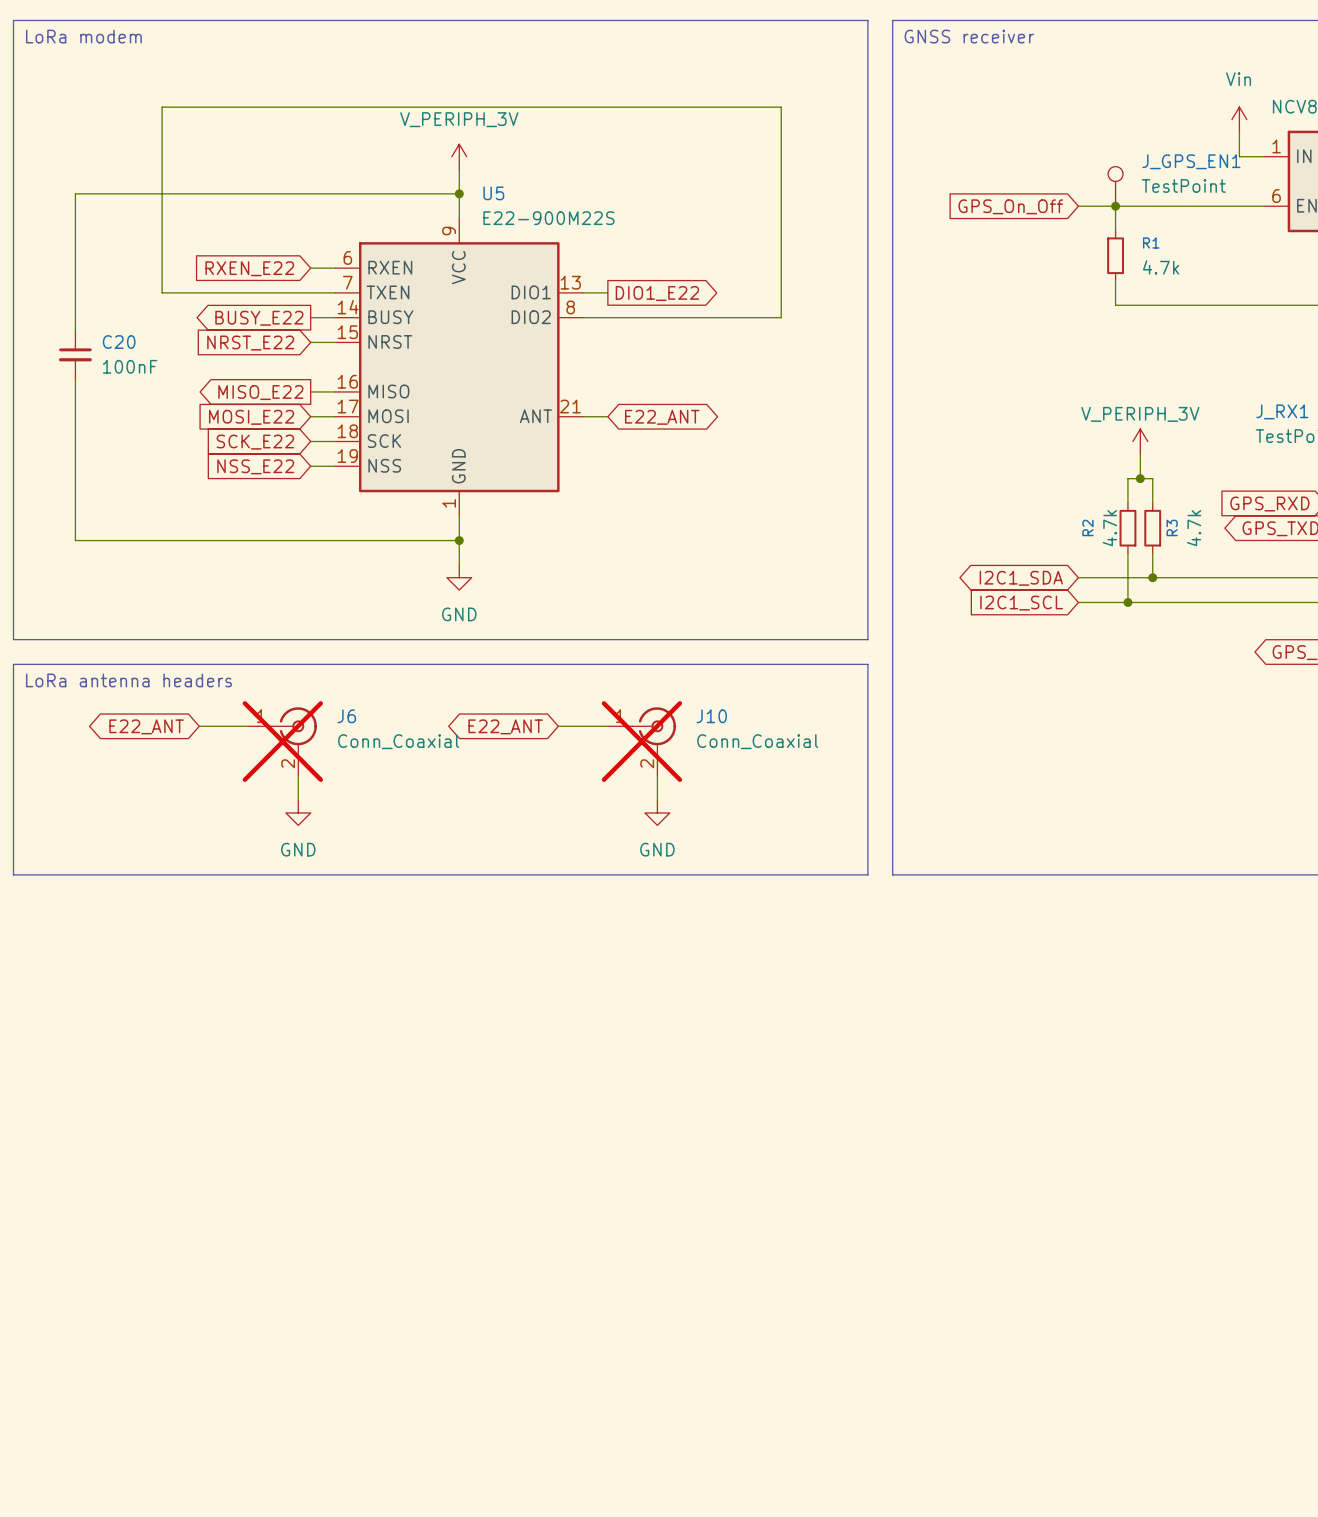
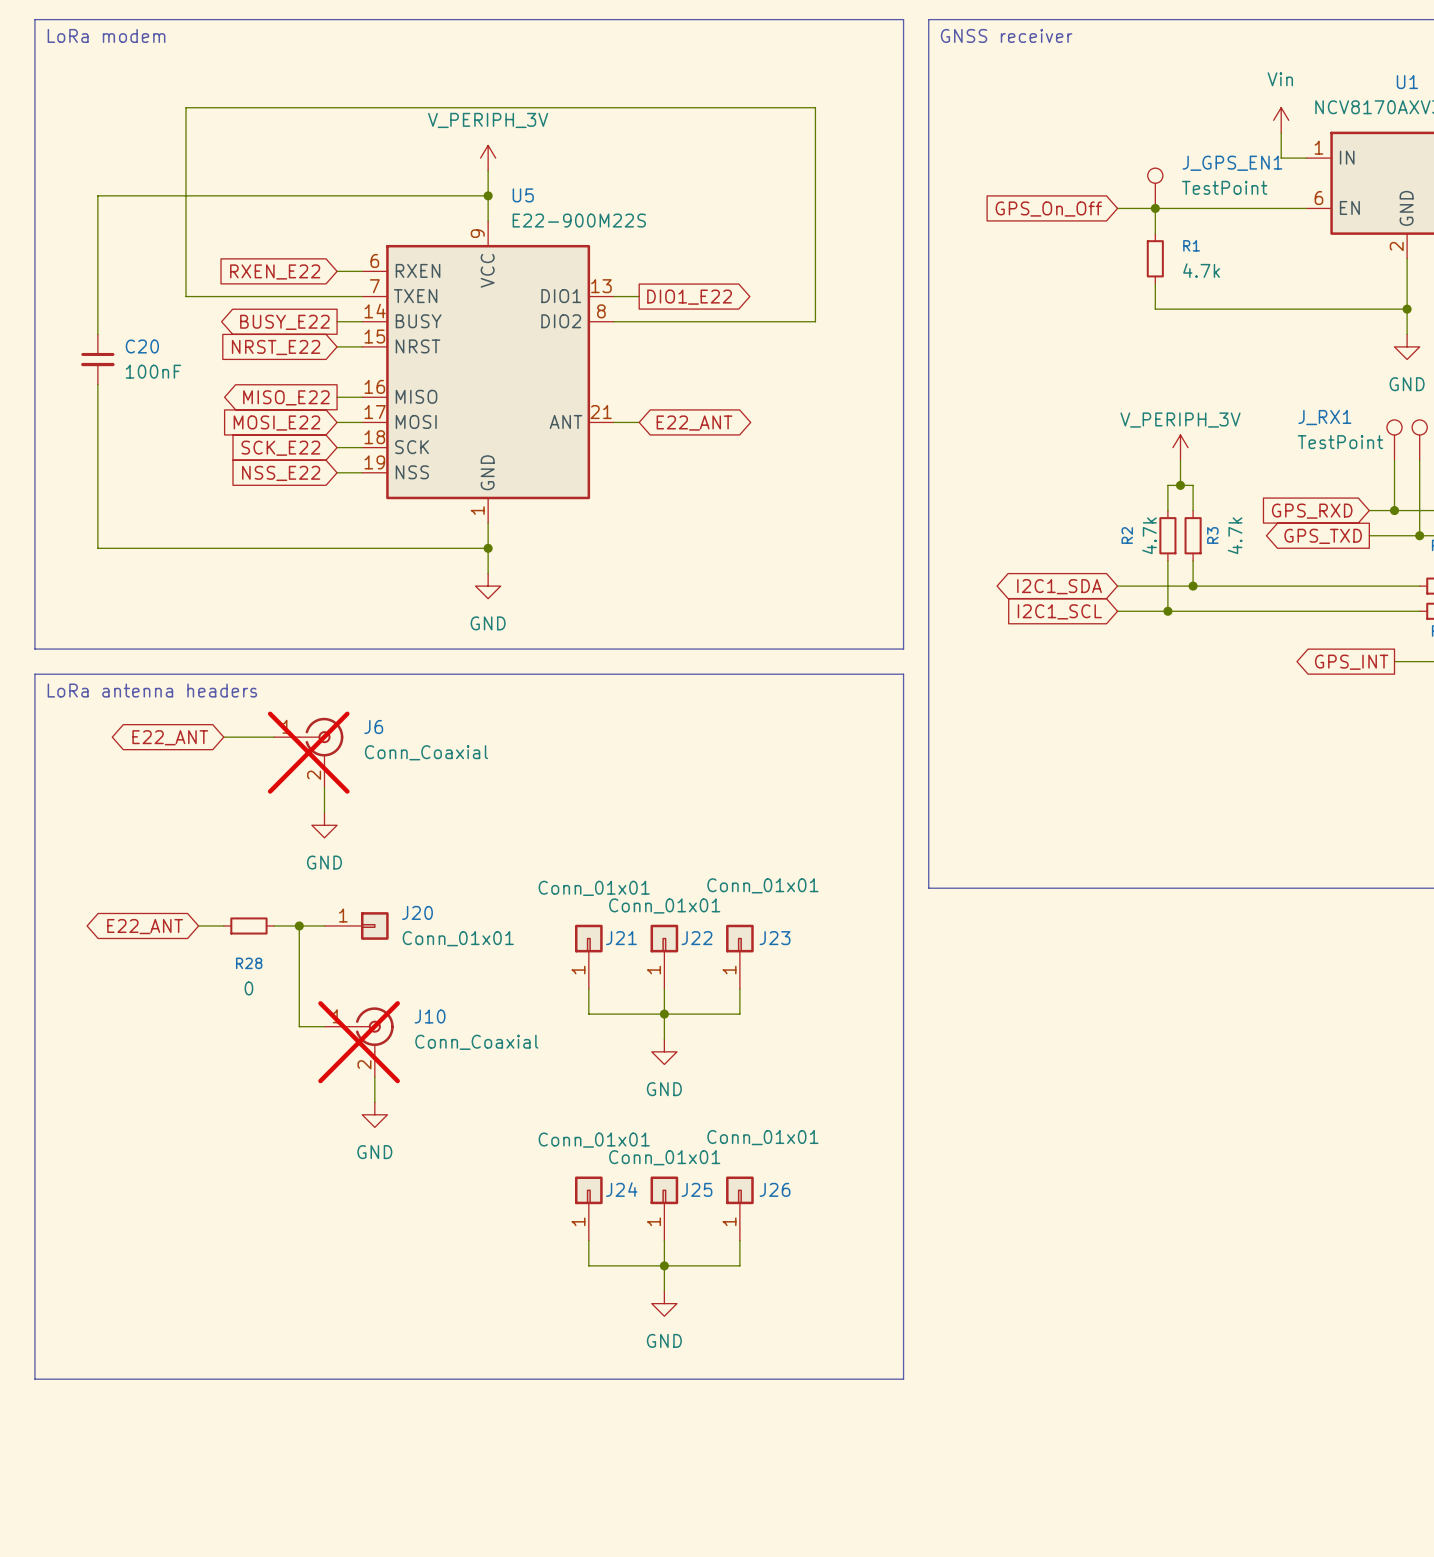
global label: E22_ANT (505, 726) -> none
wire: (558, 726) (607, 726) -> none
J10 position: (641, 741) -> (359, 1042)
wire: (657, 775) (657, 800) -> none
power symbol: GND (657, 812) -> none
line: (13, 874) (867, 874) -> (34, 888) (34, 1379) (903, 1379) (903, 888)
global label: none -> E22_ANT (145, 926)
wire: none -> (198, 925) (223, 925)
R28: none -> 0 (248, 925)
wire: none -> (274, 925) (324, 925)
wire: none -> (299, 925) (299, 1026) (324, 1026)
junction: none -> (299, 925)
J20: none -> Conn_01x01 (356, 925)
J21: none -> Conn_01x01 (588, 956)
J22: none -> Conn_01x01 (664, 956)
J23: none -> Conn_01x01 (739, 956)
wire: none -> (588, 988) (588, 1014) (739, 1014) (739, 988)
wire: none -> (664, 988) (664, 1039)
junction: none -> (664, 1014)
power symbol: none -> GND (664, 1051)
wire: none -> (374, 1077) (374, 1102)
power symbol: none -> GND (374, 1114)
J24: none -> Conn_01x01 (588, 1208)
J25: none -> Conn_01x01 (664, 1208)
J26: none -> Conn_01x01 (739, 1208)
wire: none -> (588, 1240) (588, 1265) (739, 1265) (739, 1240)
wire: none -> (664, 1240) (664, 1291)
junction: none -> (664, 1265)
power symbol: none -> GND (664, 1303)

